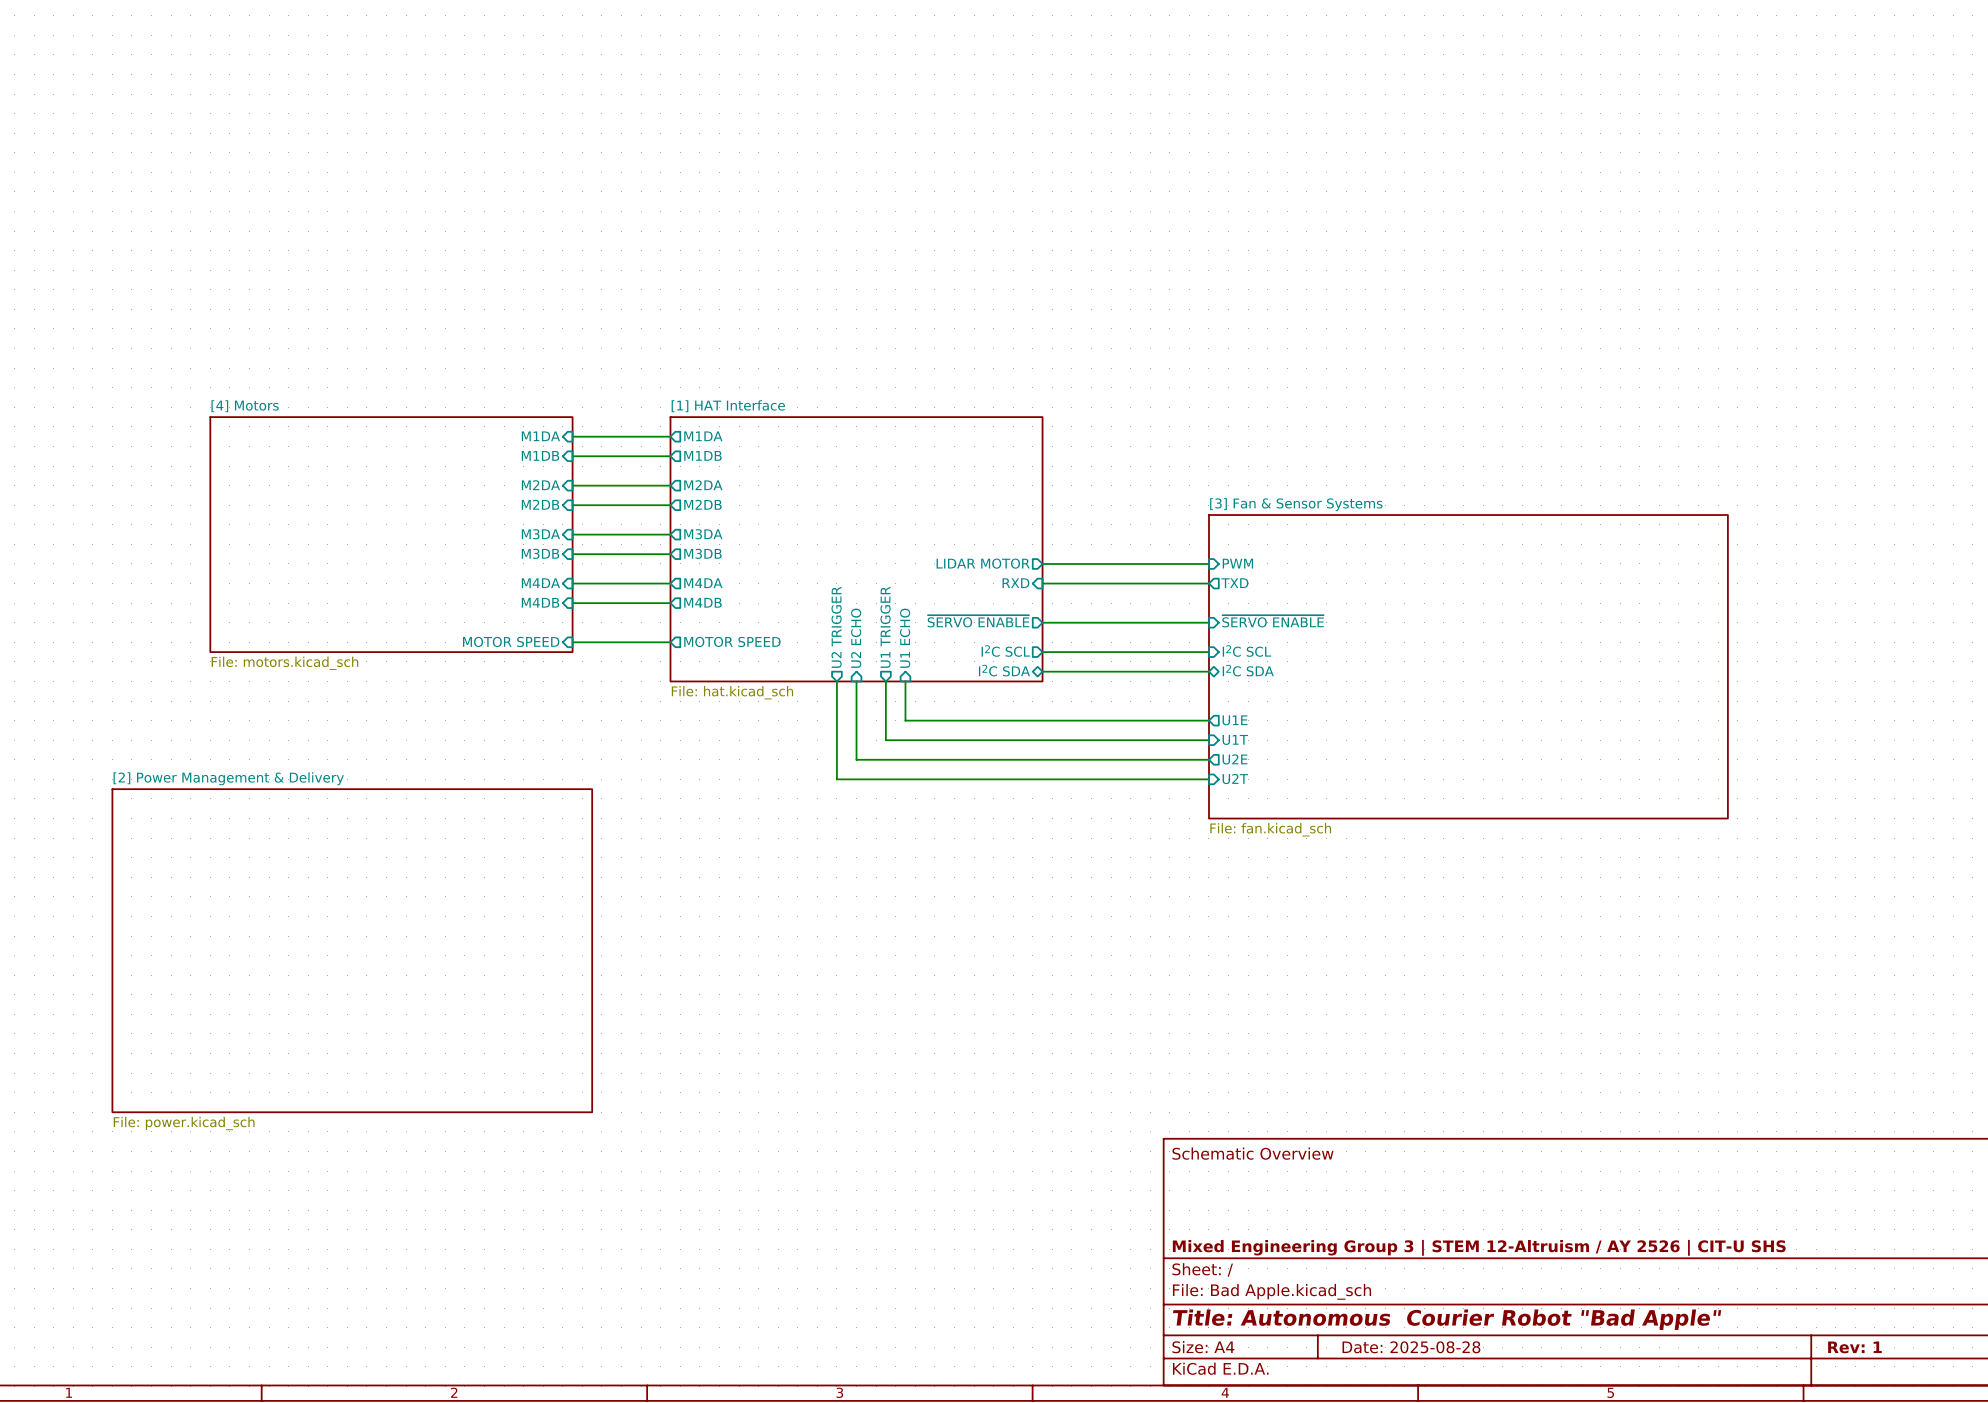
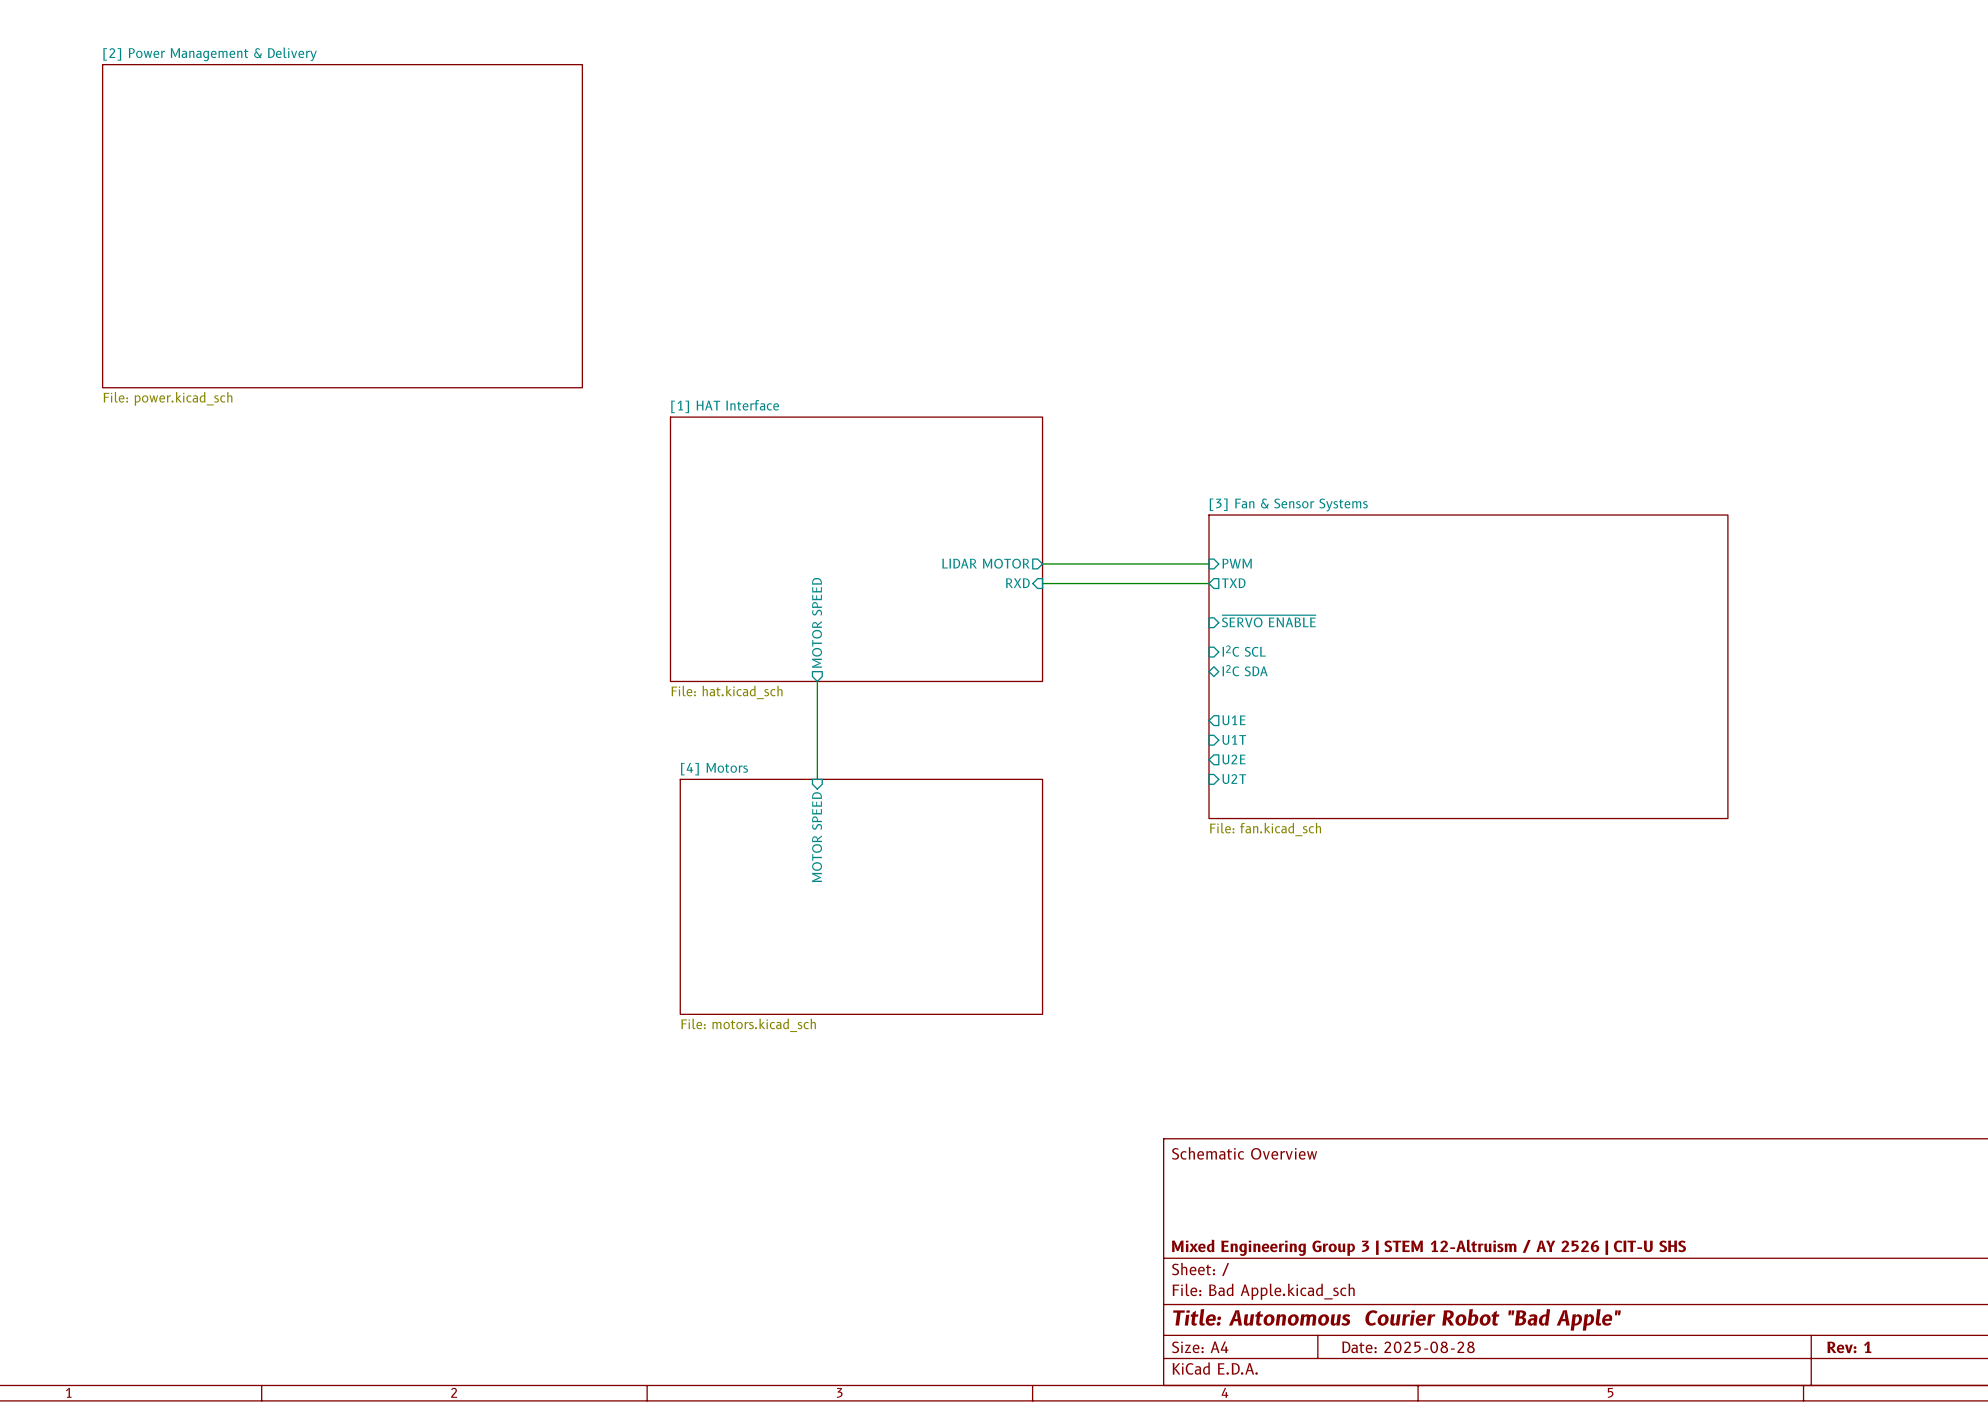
sheet pin: M1DA (540, 436) -> none
wire: (572, 436) (670, 436) -> none
sheet pin: M1DA (703, 436) -> none
sheet pin: M1DB (540, 455) -> none
sheet pin: M1DB (702, 455) -> none
wire: (572, 456) (670, 456) -> none
sheet pin: M2DA (540, 485) -> none
wire: (572, 485) (670, 485) -> none
sheet pin: M2DA (703, 485) -> none
sheet pin: M2DB (540, 504) -> none
sheet pin: M2DB (702, 504) -> none
wire: (572, 505) (670, 505) -> none
sheet [4] Motors position: (391, 534) -> (861, 896)
sheet pin: M3DA (540, 534) -> none
wire: (572, 534) (670, 534) -> none
sheet pin: M3DA (703, 534) -> none
sheet pin: M3DB (540, 553) -> none
sheet pin: M3DB (702, 553) -> none
wire: (572, 554) (670, 554) -> none
sheet pin: M4DA (540, 583) -> none
wire: (572, 583) (670, 583) -> none
sheet pin: M4DA (703, 583) -> none
sheet pin: M4DB (540, 602) -> none
sheet pin: M4DB (702, 602) -> none
wire: (572, 603) (670, 603) -> none
sheet pin: none -> MOTOR SPEED (817, 622)
sheet pin: ~{SERVO ENABLE} (978, 621) -> none
wire: (1042, 622) (1208, 622) -> none
sheet pin: U2 TRIGGER (836, 627) -> none
sheet pin: U1 TRIGGER (885, 627) -> none
sheet pin: U2 ECHO (856, 638) -> none
sheet pin: U1 ECHO (905, 638) -> none
sheet pin: MOTOR SPEED (511, 641) -> none
sheet pin: MOTOR SPEED (732, 641) -> none
wire: (572, 642) (670, 642) -> none
sheet pin: I2C SCL (1005, 651) -> none
wire: (1042, 652) (1208, 652) -> none
sheet pin: I2C SDA (1004, 670) -> none
wire: (1042, 671) (1208, 671) -> none
wire: none -> (817, 681) (817, 779)
wire: (836, 681) (836, 779) (1208, 779) -> none
wire: (856, 681) (856, 759) (1208, 759) -> none
wire: (885, 681) (885, 740) (1208, 740) -> none
wire: (905, 681) (905, 720) (1208, 720) -> none
sheet pin: none -> MOTOR SPEED (817, 837)
sheet [2] Power Management & Delivery position: (352, 950) -> (342, 226)

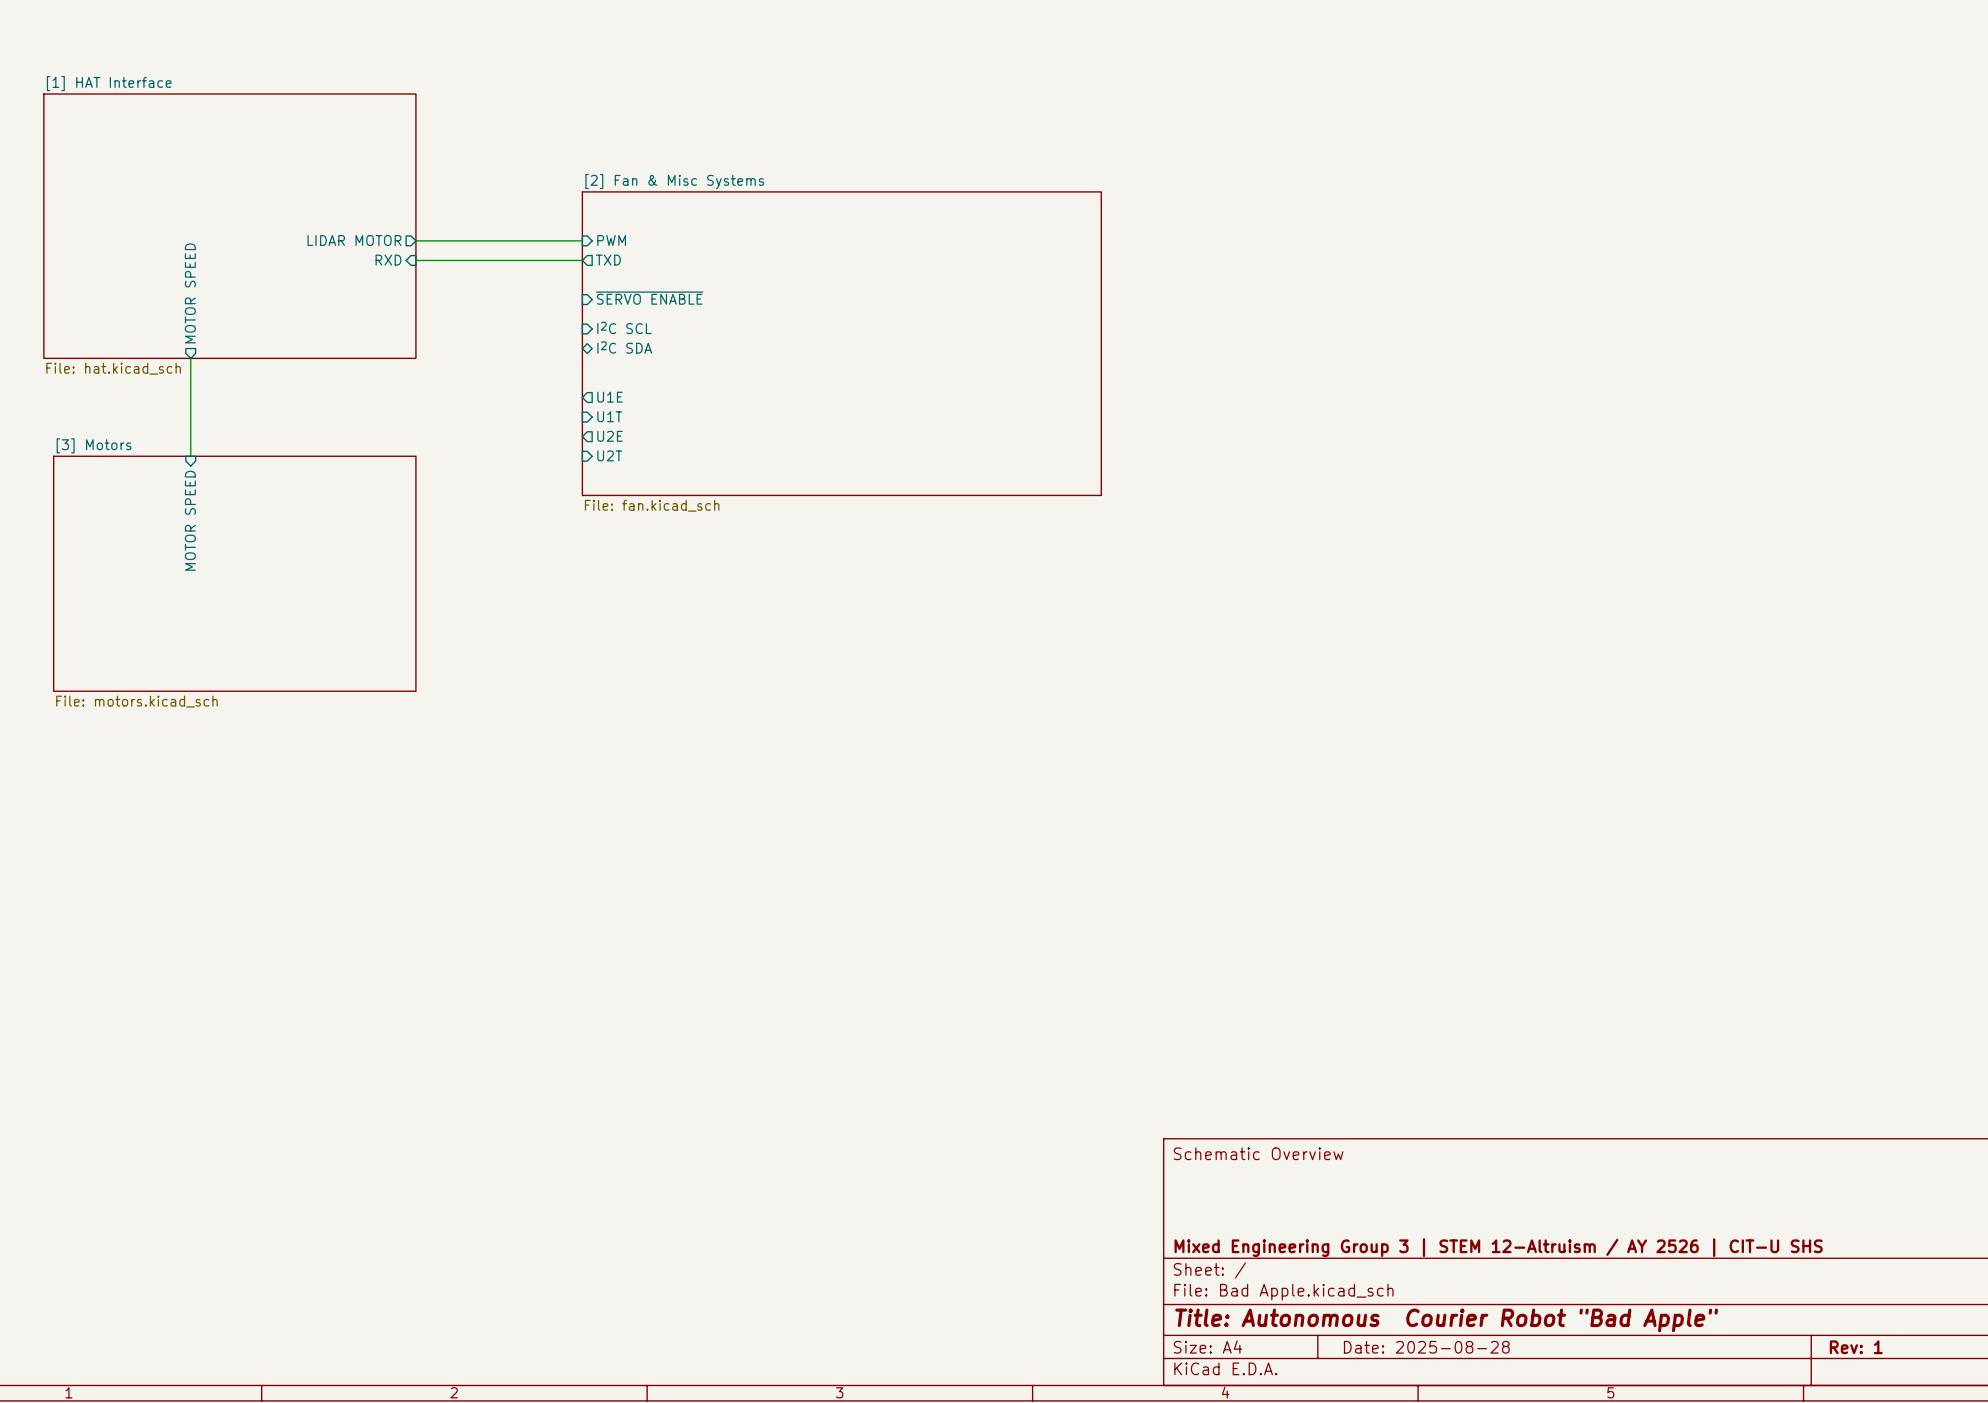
sheet [2] Power Management & Delivery: File: power.kicad_sch (342, 226) -> none
sheet pin: none -> LIDAR MOTOR (354, 240)
wire: none -> (415, 240) (582, 240)
sheet pin: none -> PWM (611, 240)
sheet pin: none -> RXD (388, 260)
wire: none -> (415, 260) (582, 260)
sheet pin: none -> TXD (608, 260)
sheet pin: none -> ~{SERVO ENABLE} (649, 298)
sheet pin: none -> MOTOR SPEED (190, 293)
sheet pin: none -> I2C SCL (624, 327)
sheet [2] Fan & Misc Systems: none -> File: fan.kicad_sch (841, 343)
sheet pin: none -> I2C SDA (624, 347)
wire: none -> (190, 358) (190, 456)
sheet pin: none -> U1E (610, 397)
sheet pin: none -> U1T (609, 416)
sheet pin: none -> U2E (610, 436)
sheet pin: none -> U2T (609, 455)
sheet pin: none -> MOTOR SPEED (190, 520)
sheet [1] HAT Interface position: (856, 549) -> (229, 226)
sheet pin: LIDAR MOTOR (985, 563) -> none
wire: (1042, 563) (1208, 563) -> none
sheet pin: PWM (1237, 563) -> none
sheet [3] Motors: none -> File: motors.kicad_sch (234, 573)
sheet pin: RXD (1017, 583) -> none
wire: (1042, 583) (1208, 583) -> none
sheet pin: TXD (1233, 583) -> none
sheet pin: ~{SERVO ENABLE} (1268, 621) -> none
sheet pin: MOTOR SPEED (817, 622) -> none
sheet pin: I2C SCL (1244, 651) -> none
sheet [3] Fan & Sensor Systems: File: fan.kicad_sch (1468, 666) -> none
sheet pin: I2C SDA (1245, 670) -> none
wire: (817, 681) (817, 779) -> none
sheet pin: U1E (1233, 720) -> none
sheet pin: U1T (1234, 739) -> none
sheet pin: U2E (1233, 759) -> none
sheet pin: U2T (1234, 779) -> none
sheet pin: MOTOR SPEED (817, 837) -> none
sheet [4] Motors: File: motors.kicad_sch (861, 896) -> none

